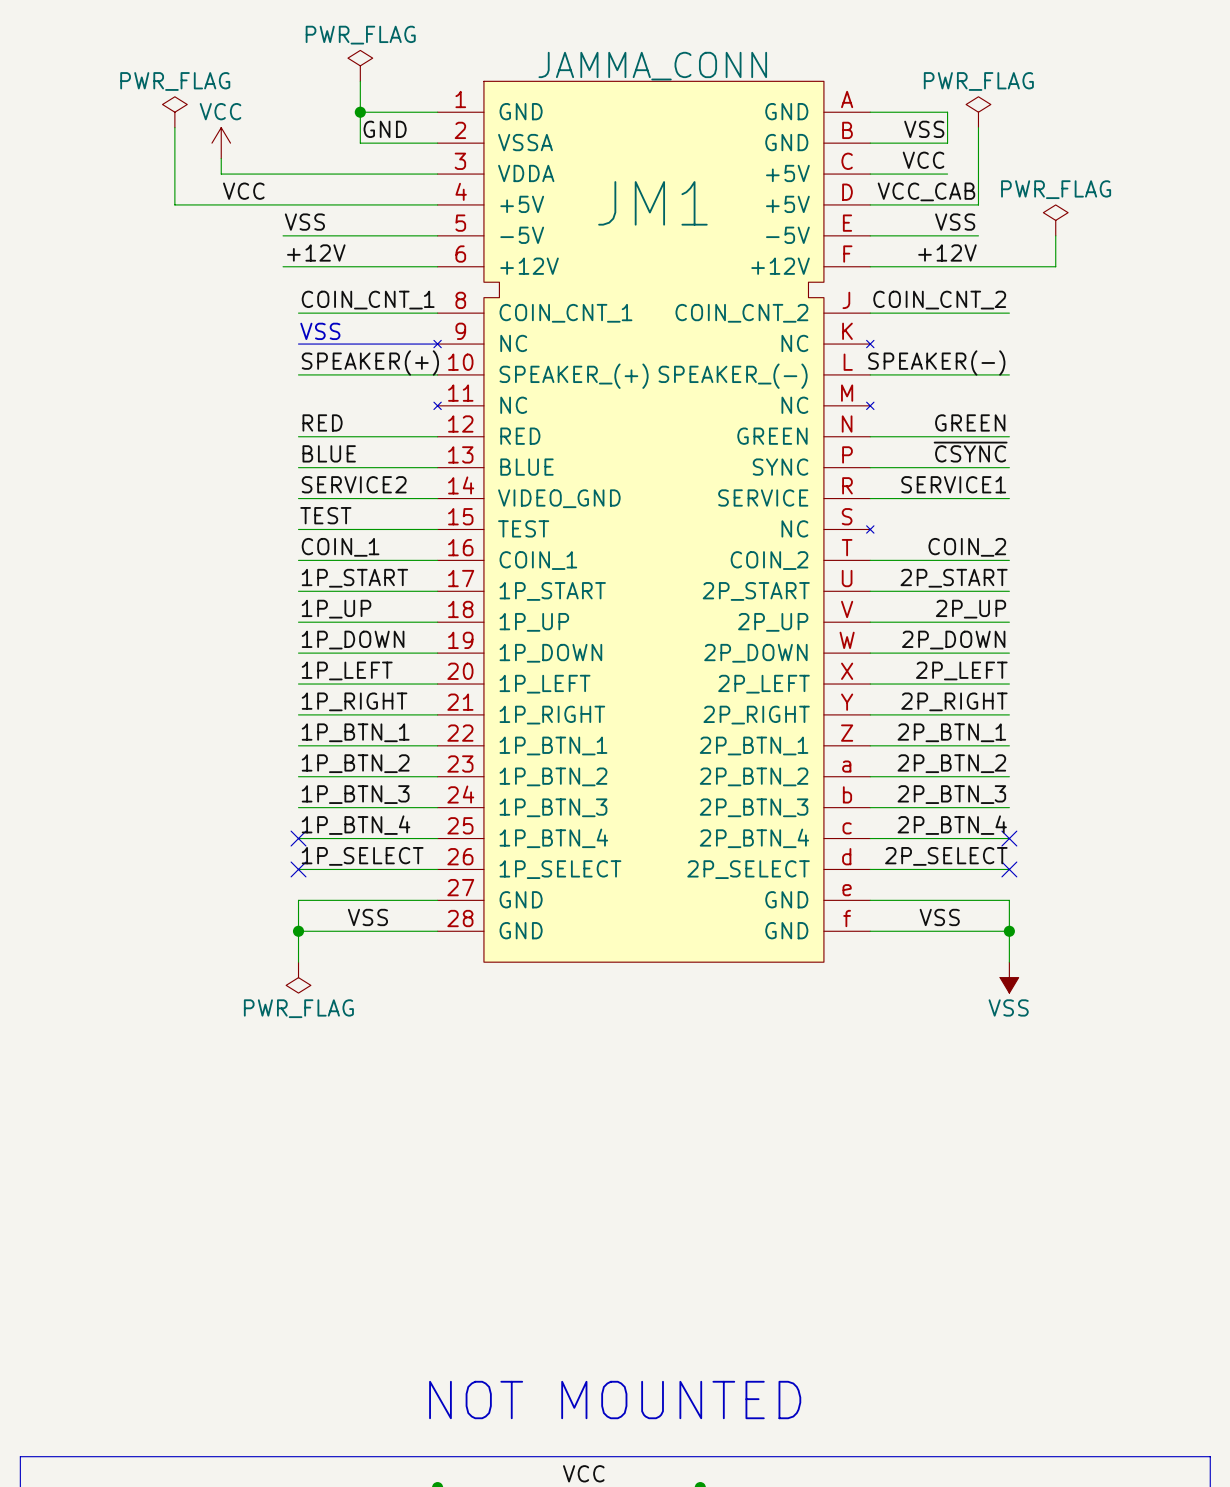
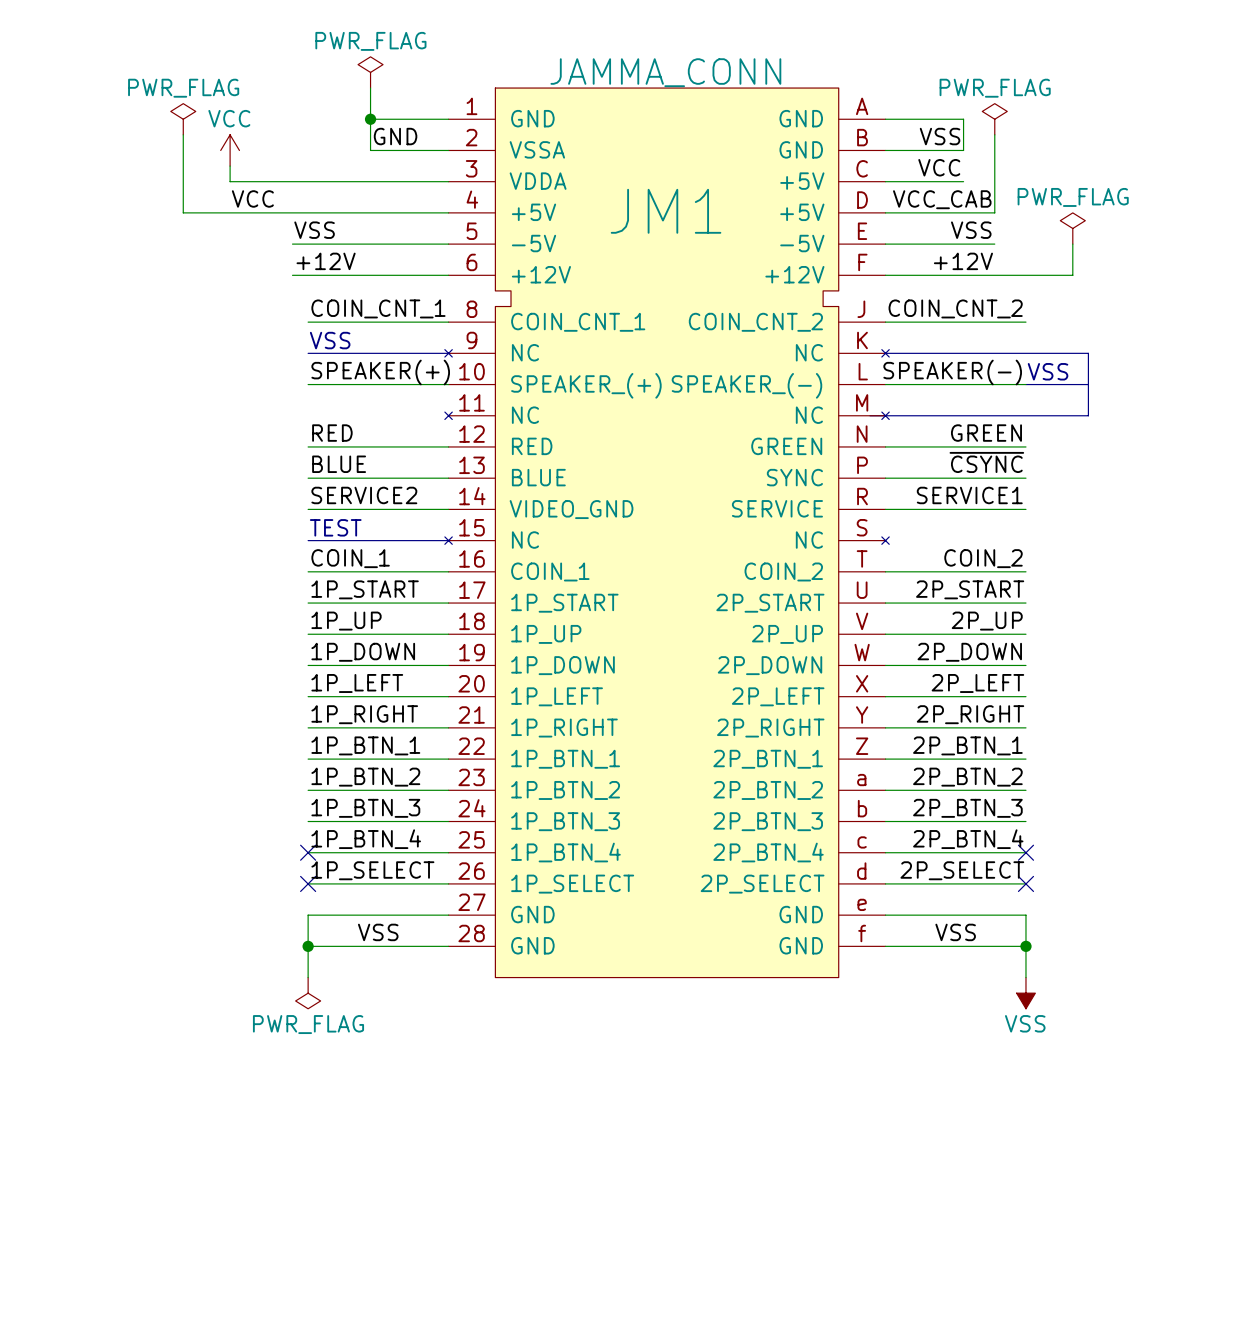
JM1 symbol: [433, 81, 874, 963] -> [444, 88, 890, 978]
line: none -> (885, 353) (1088, 353) (1088, 415) (869, 415)
text: none -> VSS (1048, 371)
line: none -> (1025, 384) (1088, 384)
label: TEST (325, 515) -> none
text: none -> TEST (335, 527)
line: none -> (308, 540) (448, 540)

